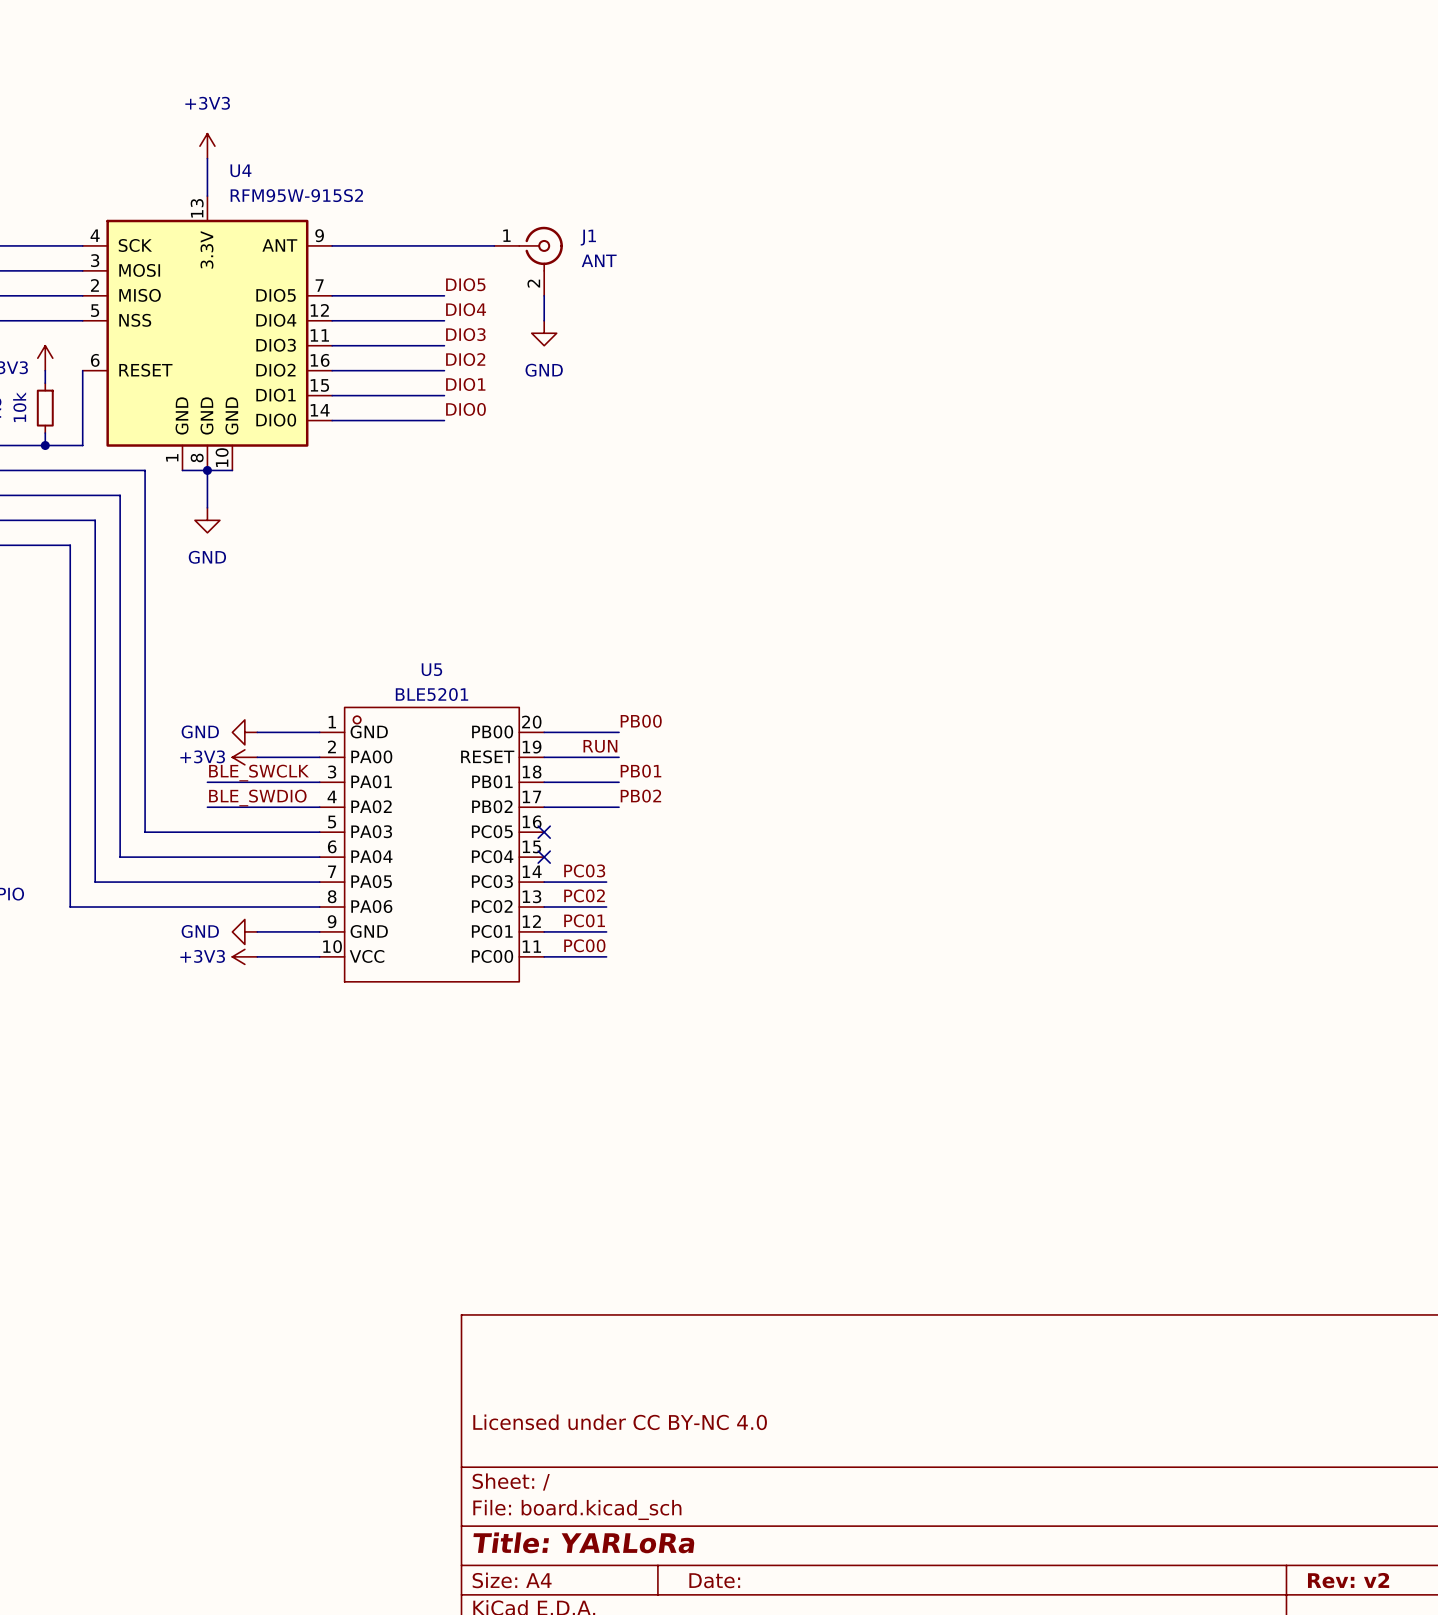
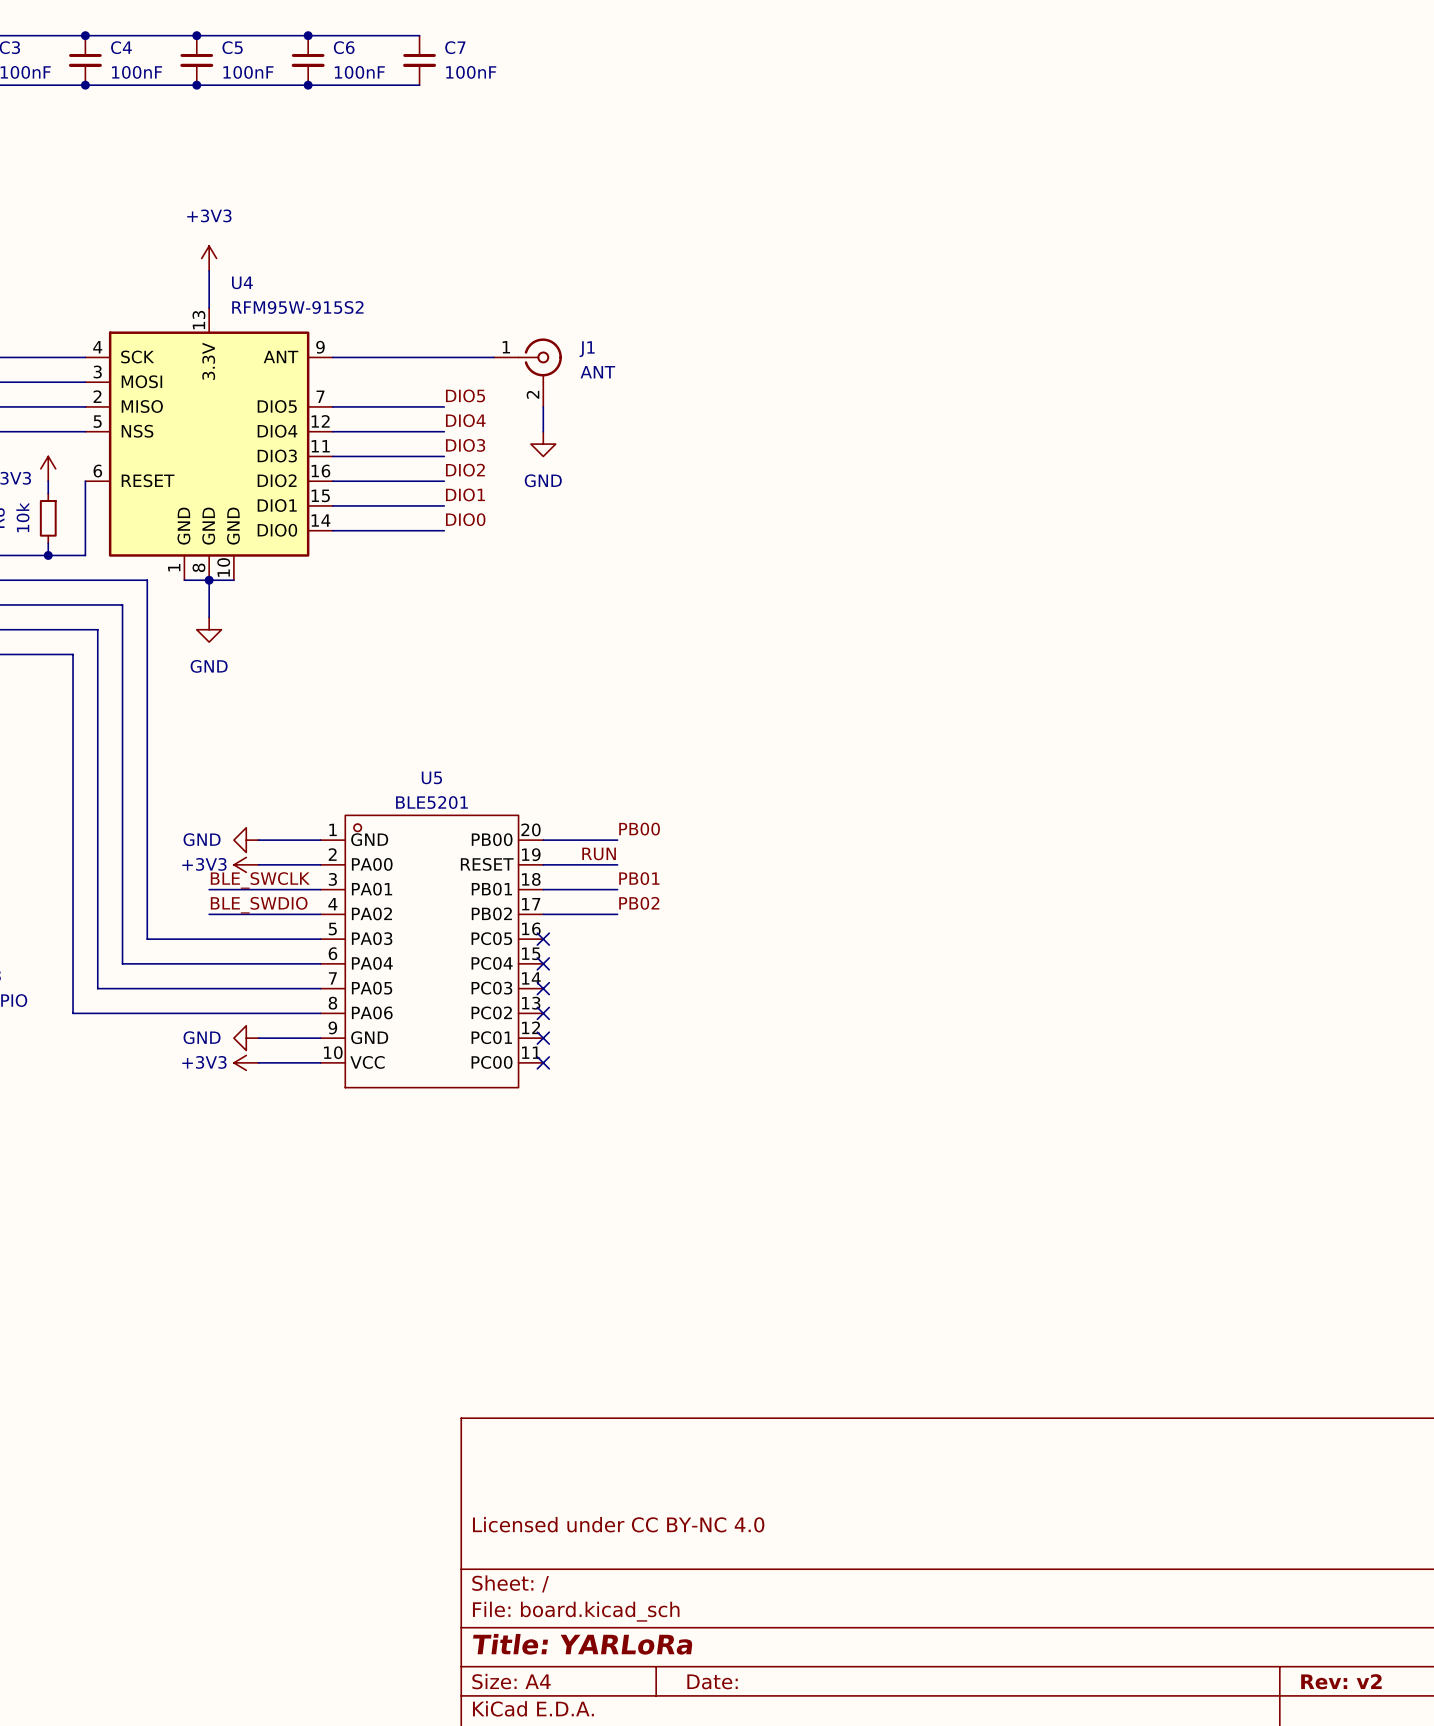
label: PC03 (584, 870) -> none
wire: (544, 882) (606, 882) -> none
no-connect mark: none -> (543, 988)
label: PC02 (584, 895) -> none
wire: (544, 907) (606, 907) -> none
no-connect mark: none -> (543, 1013)
label: PC01 (584, 920) -> none
wire: (544, 931) (606, 931) -> none
no-connect mark: none -> (543, 1038)
label: PC00 (584, 945) -> none
wire: (544, 956) (606, 956) -> none
no-connect mark: none -> (543, 1062)

